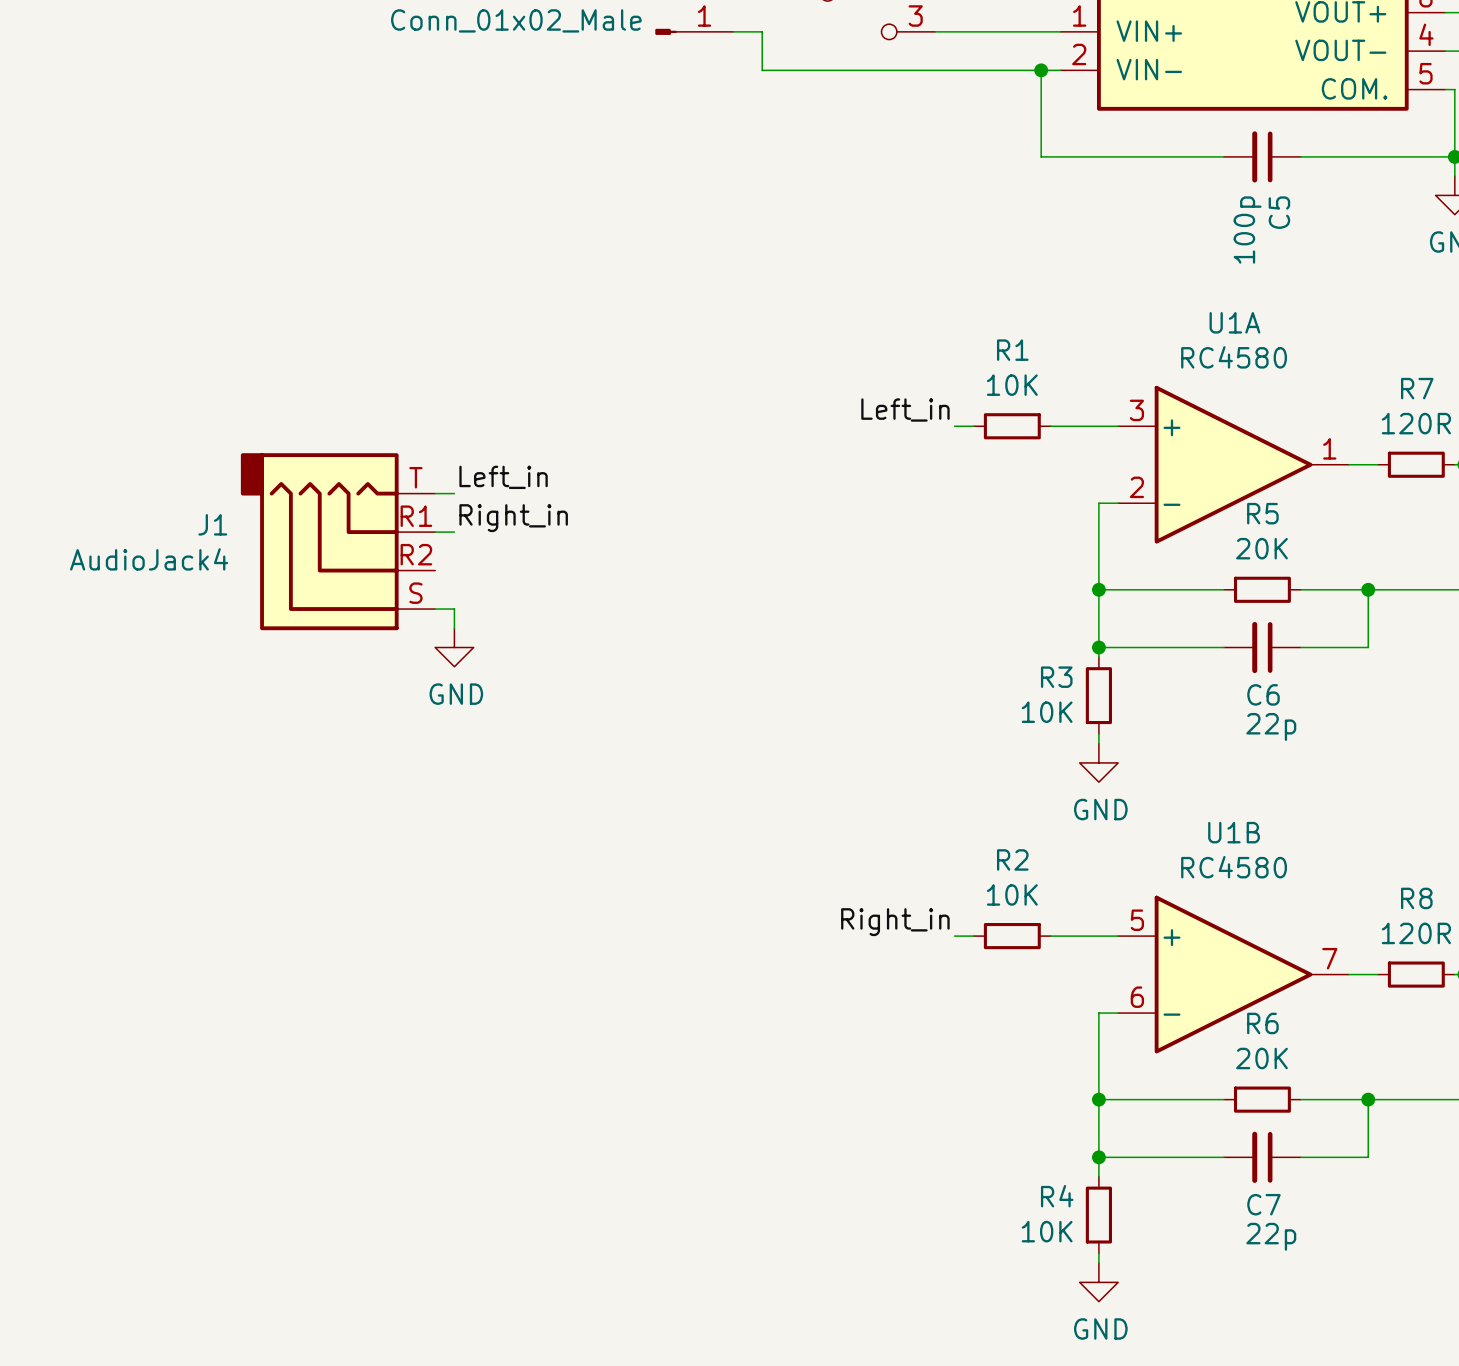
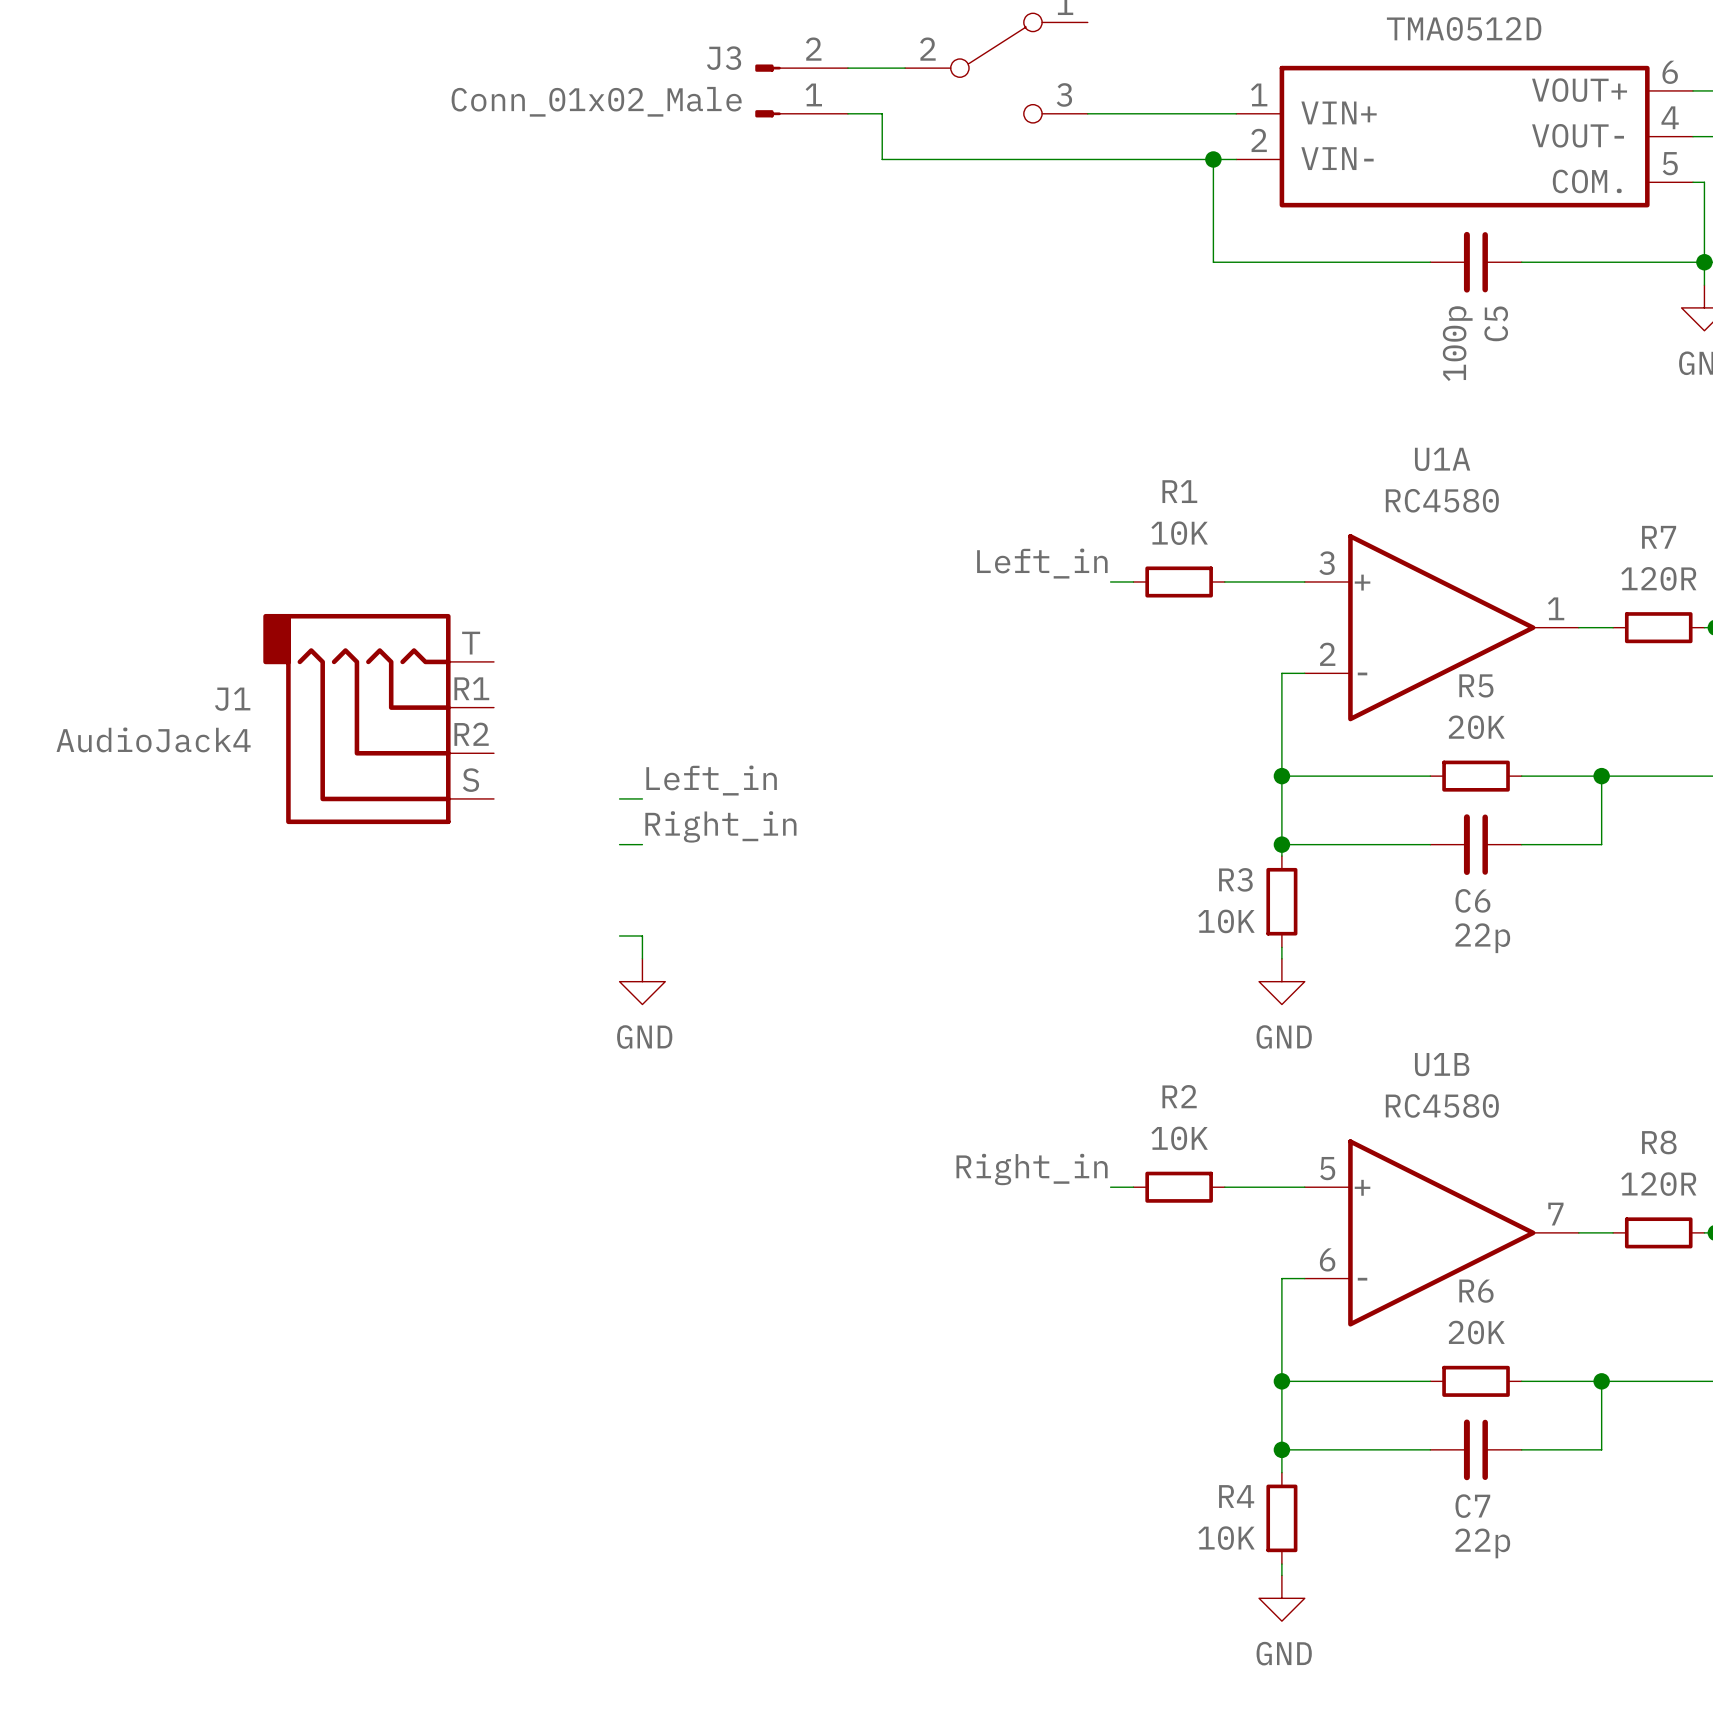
label position: Left_in (503, 477) -> Left_in (711, 780)
wire: (435, 493) (454, 493) -> (619, 798) (642, 798)
label position: Right_in (513, 518) -> Right_in (720, 826)
wire: (435, 532) (454, 532) -> (619, 844) (642, 844)
wire: (435, 609) (454, 609) (454, 628) -> (619, 935) (642, 935) (642, 958)
power symbol position: GND (454, 647) -> GND (642, 981)

